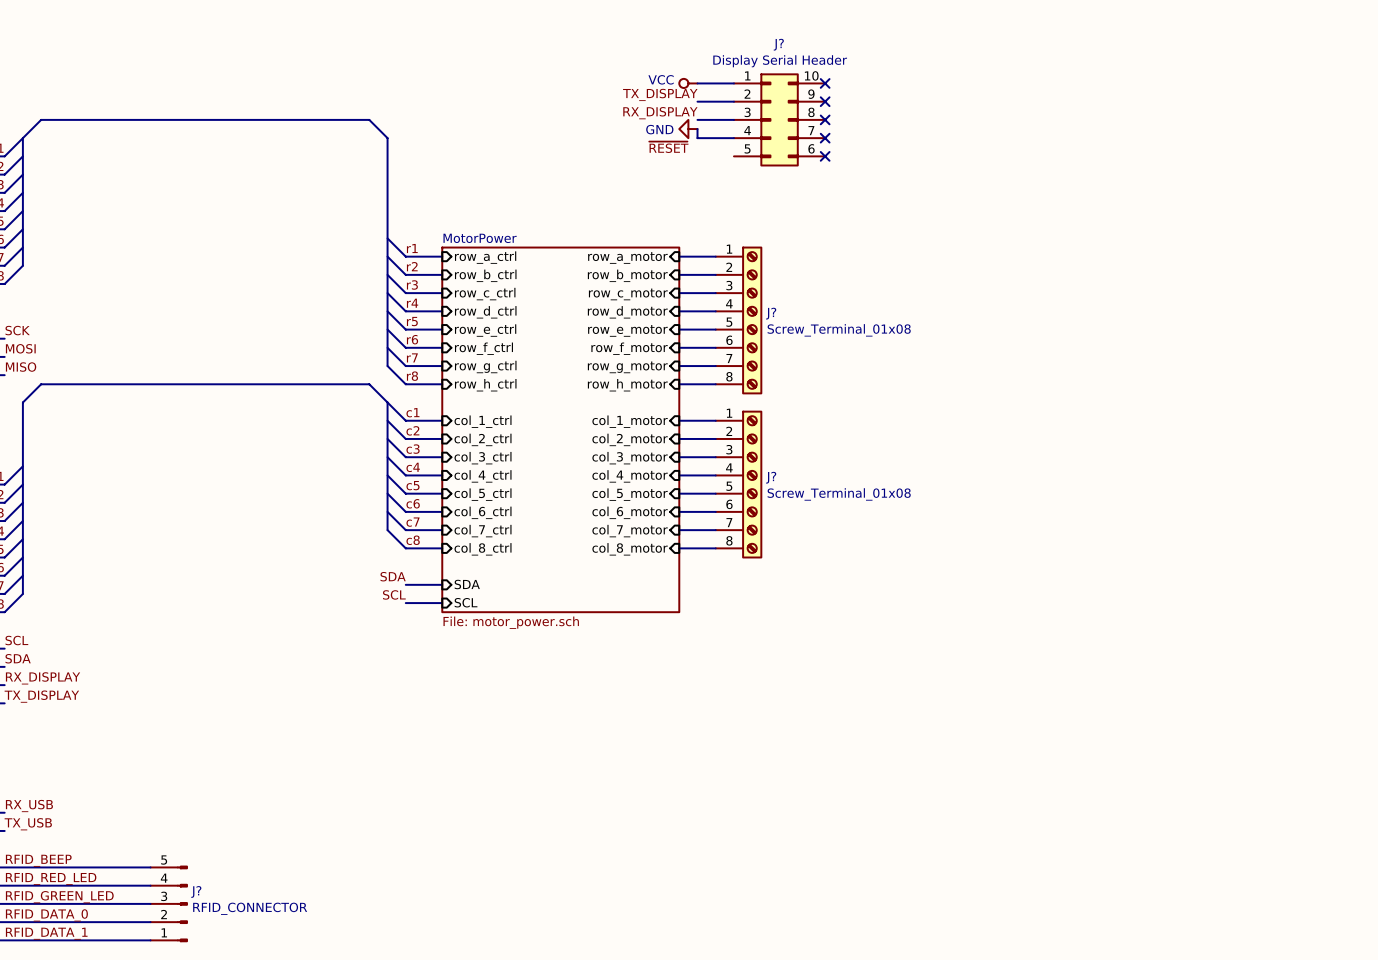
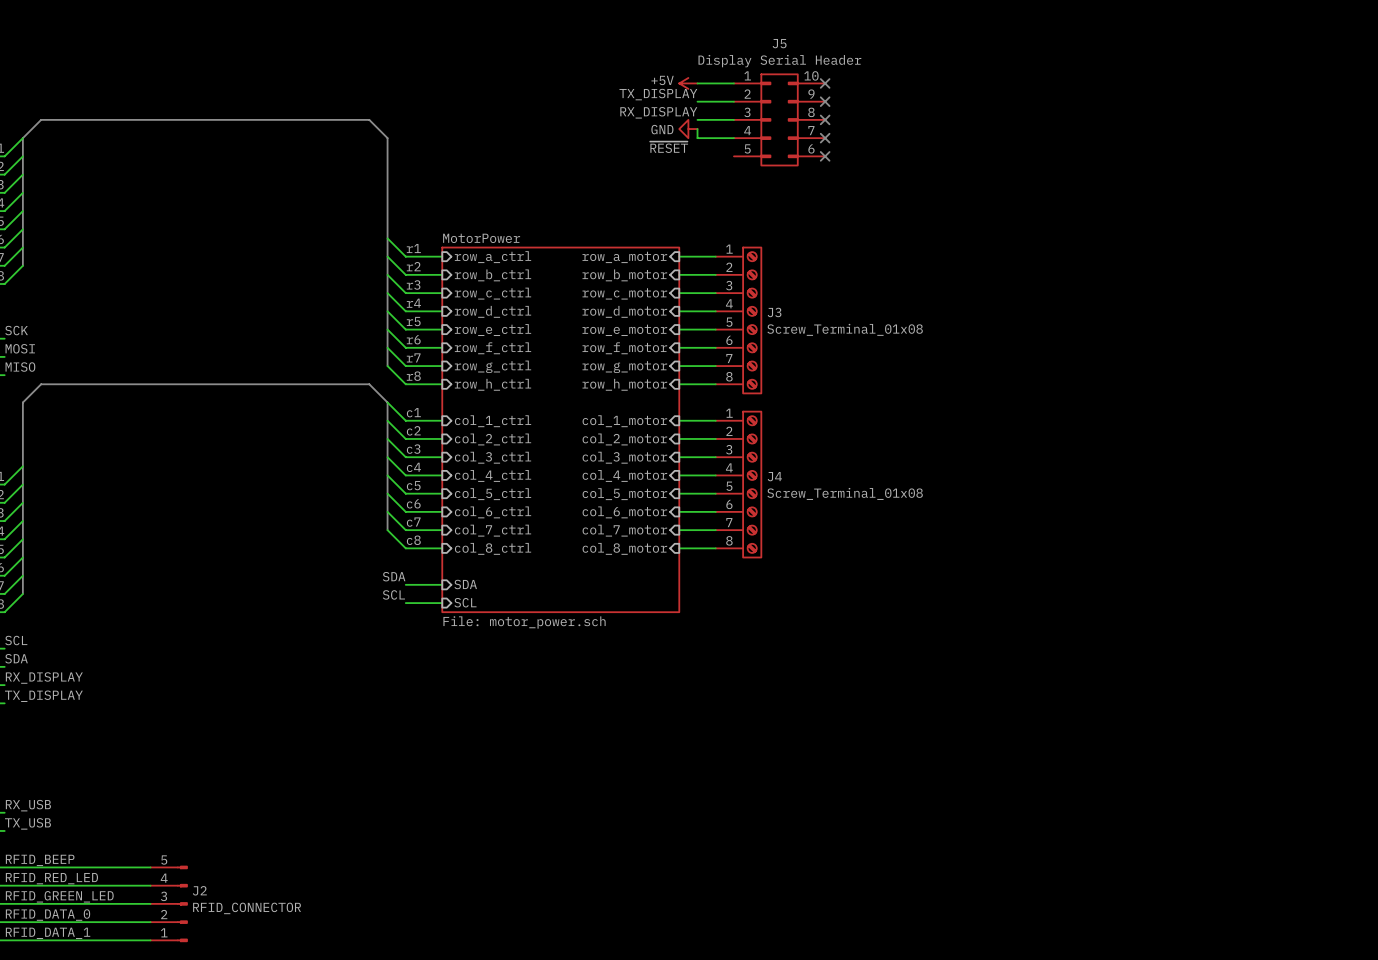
J? name: J? (778, 44) -> J5 (779, 43)
power symbol: VCC (688, 83) -> +5V (688, 83)
J? name: J? (771, 313) -> J3 (774, 312)
J? name: J? (771, 477) -> J4 (774, 476)
J? name: J? (196, 891) -> J2 (199, 890)

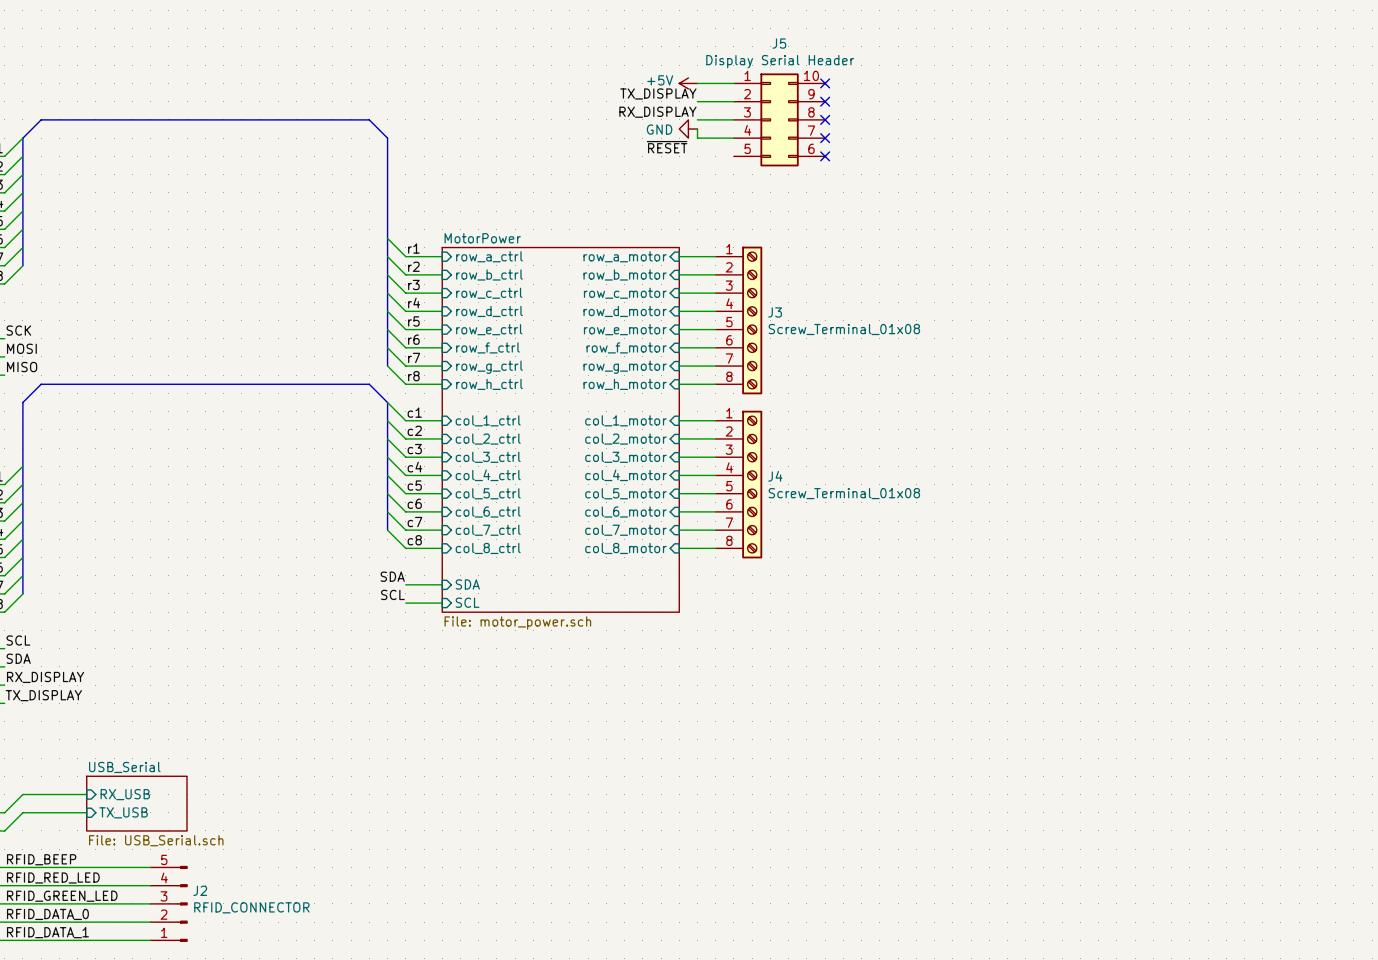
wire: none -> (86, 794) (22, 794) (4, 812)
sheet pin: none -> RX_USB (125, 794)
sheet USB_Serial: none -> File: USB_Serial.sch (136, 803)
label: RX_USB (28, 805) -> none
wire: none -> (86, 812) (22, 812) (4, 830)
sheet pin: none -> TX_USB (123, 812)
label: TX_USB (27, 823) -> none

